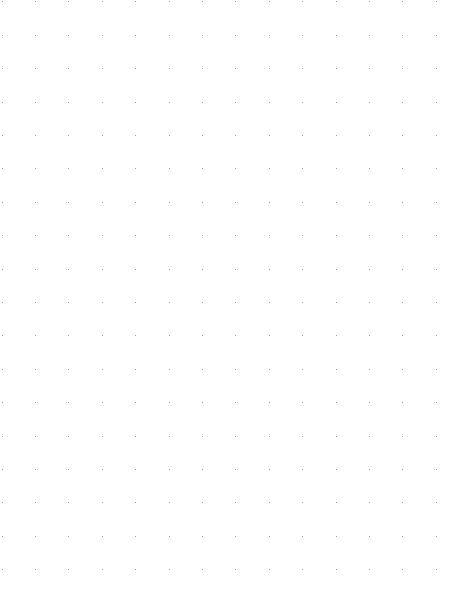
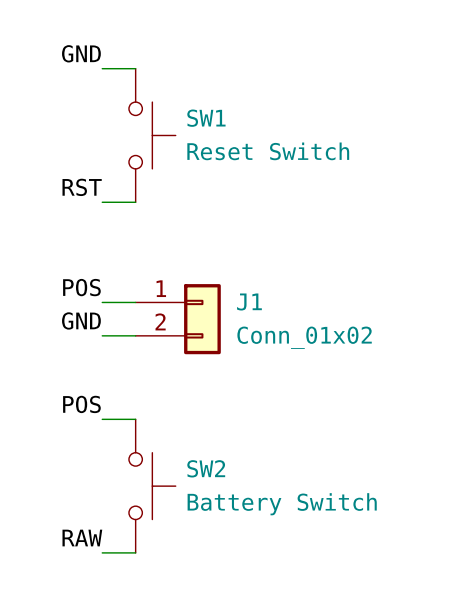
label: none -> GND (81, 53)
wire: none -> (102, 68) (135, 68)
SW1: none -> Reset Switch (152, 135)
label: none -> RST (82, 187)
wire: none -> (102, 202) (135, 202)
label: none -> POS (81, 287)
wire: none -> (102, 302) (135, 302)
J1: none -> Conn_01x02 (178, 319)
label: none -> GND (81, 320)
wire: none -> (102, 335) (135, 335)
label: none -> POS (81, 404)
wire: none -> (102, 419) (135, 419)
SW2: none -> Battery Switch (152, 486)
label: none -> RAW (82, 538)
wire: none -> (102, 552) (135, 552)

